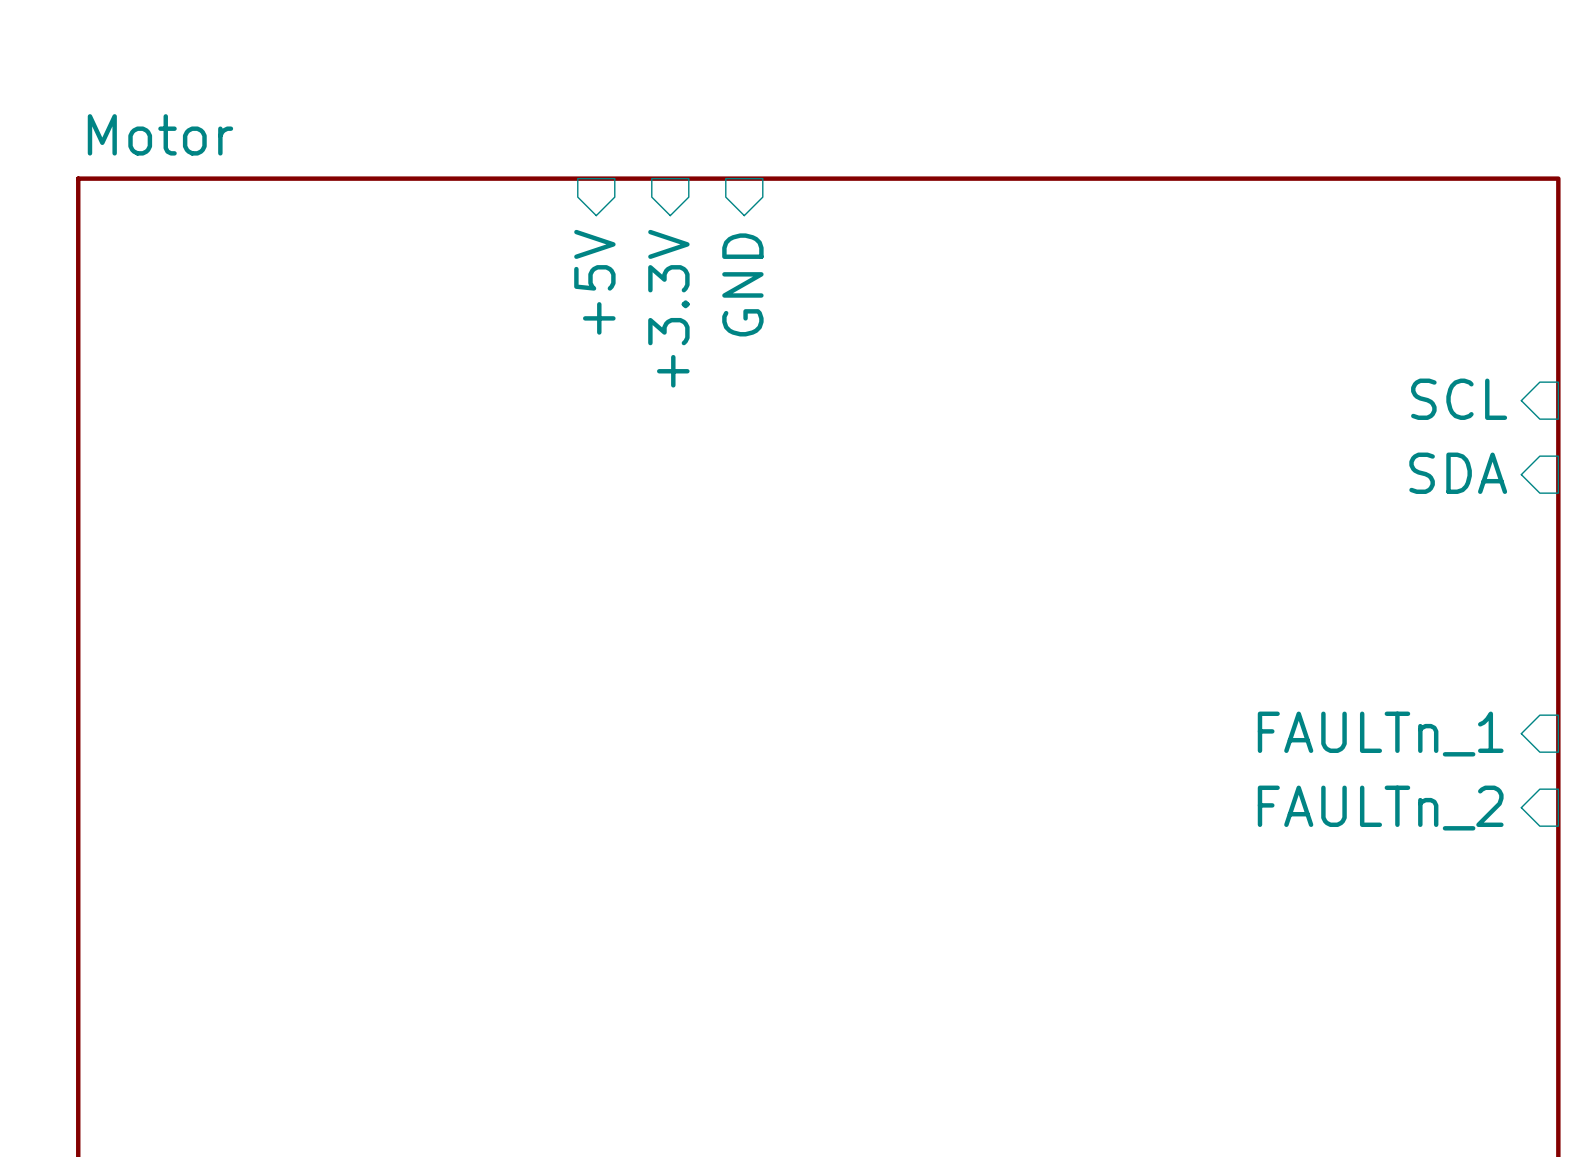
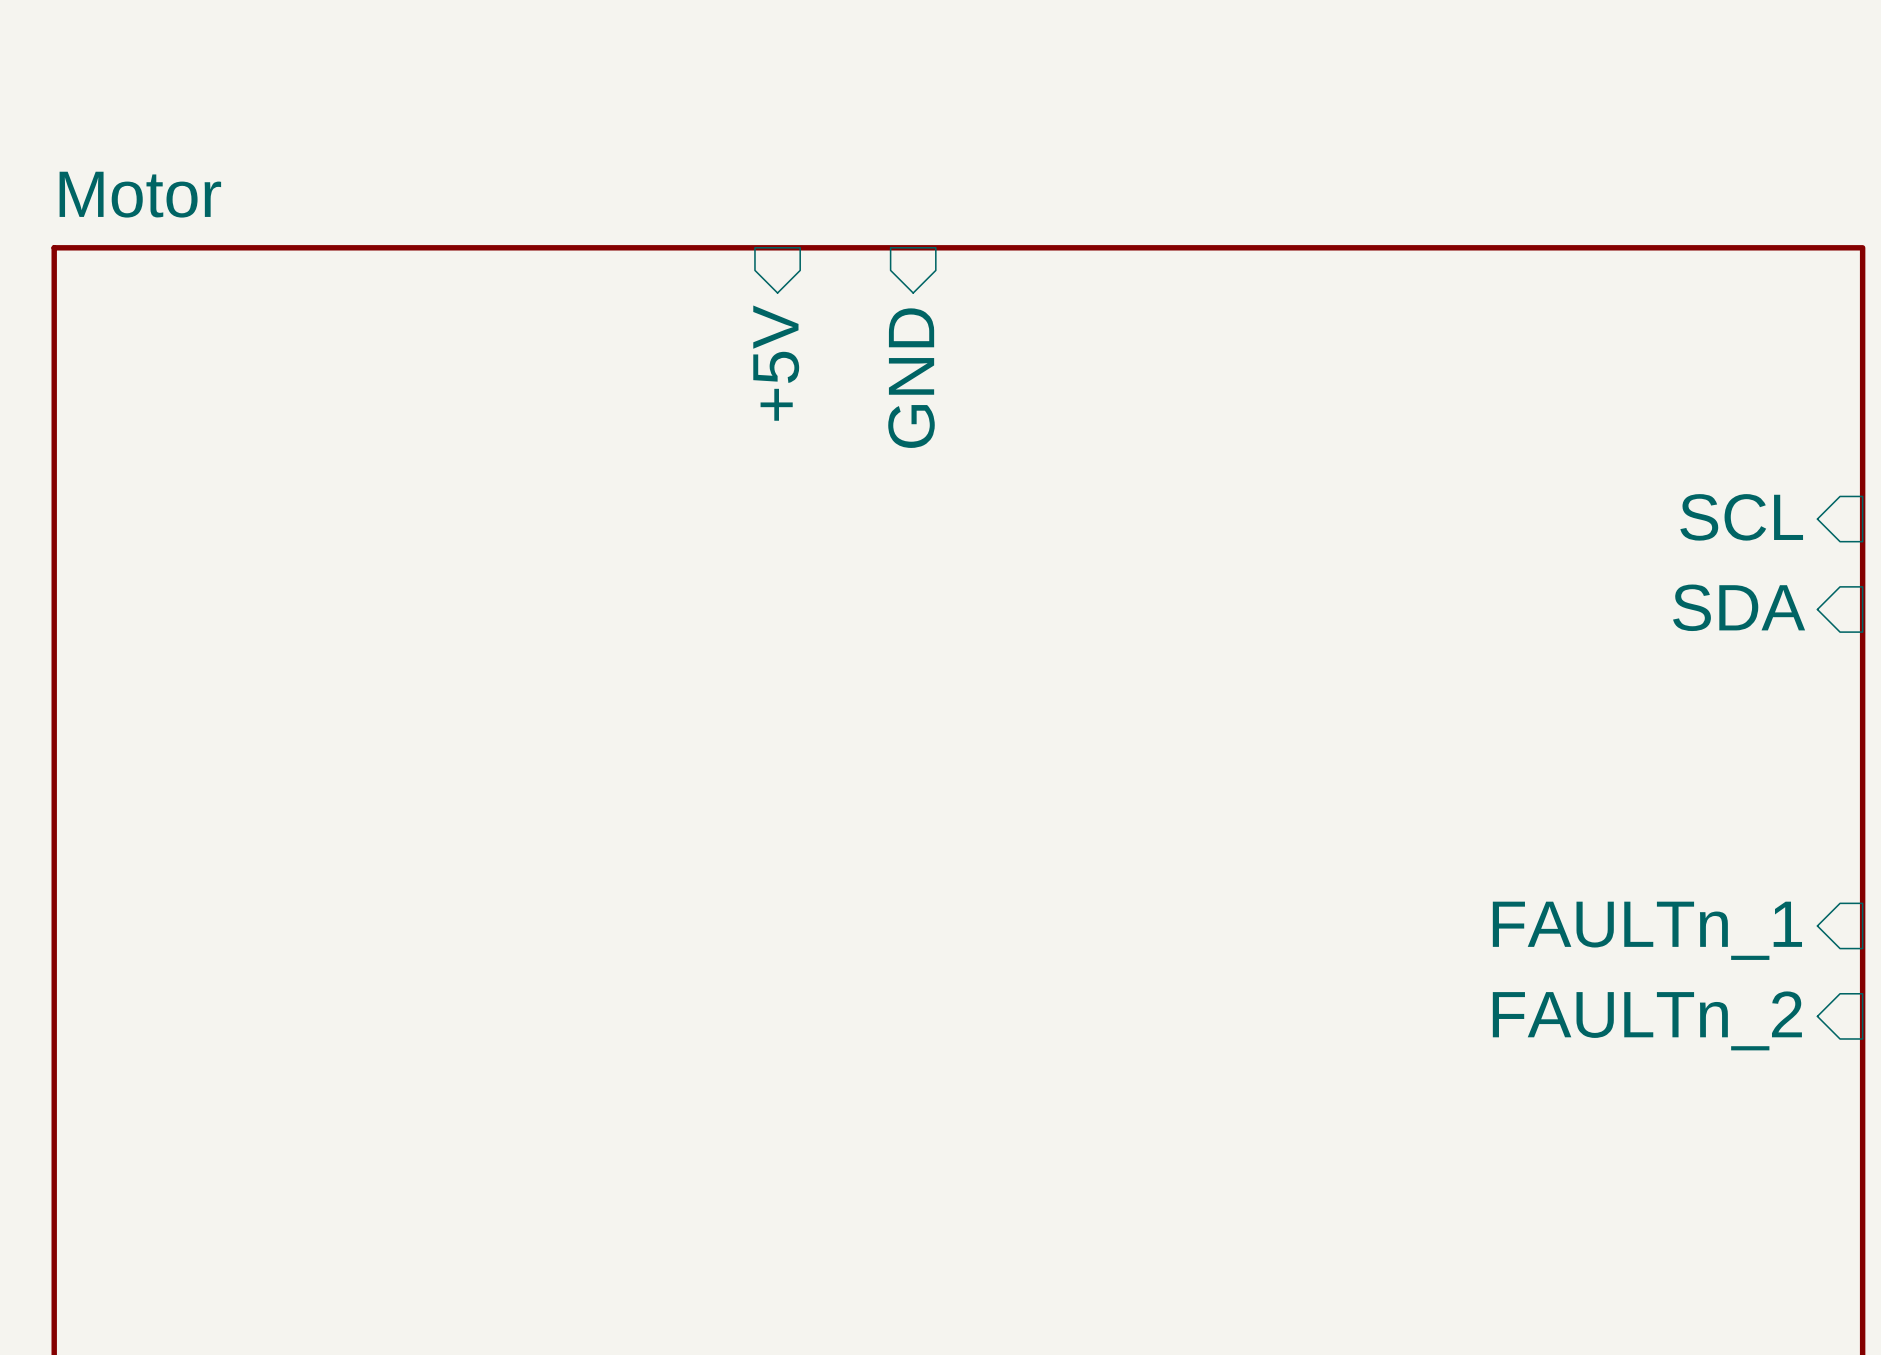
sheet pin: +5V (594, 282) -> none
sheet pin position: GND (742, 284) -> GND (911, 378)
sheet pin: +3.3V (668, 308) -> +5V (776, 363)

